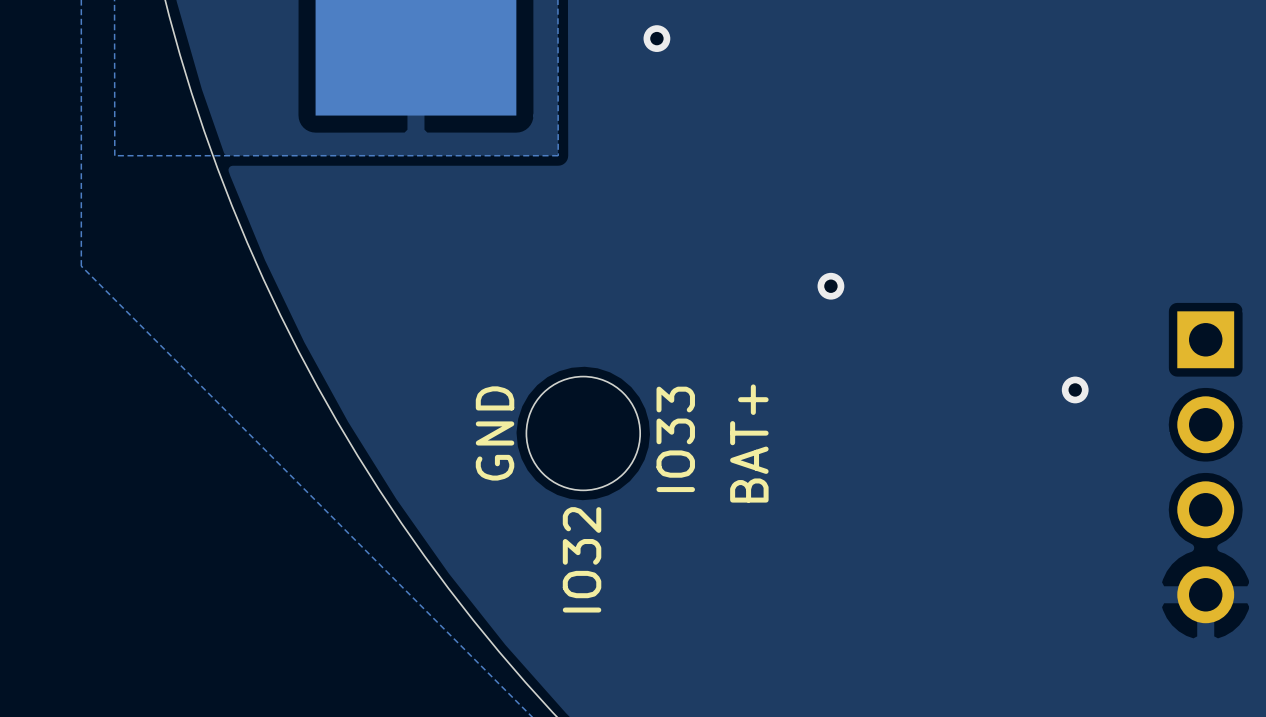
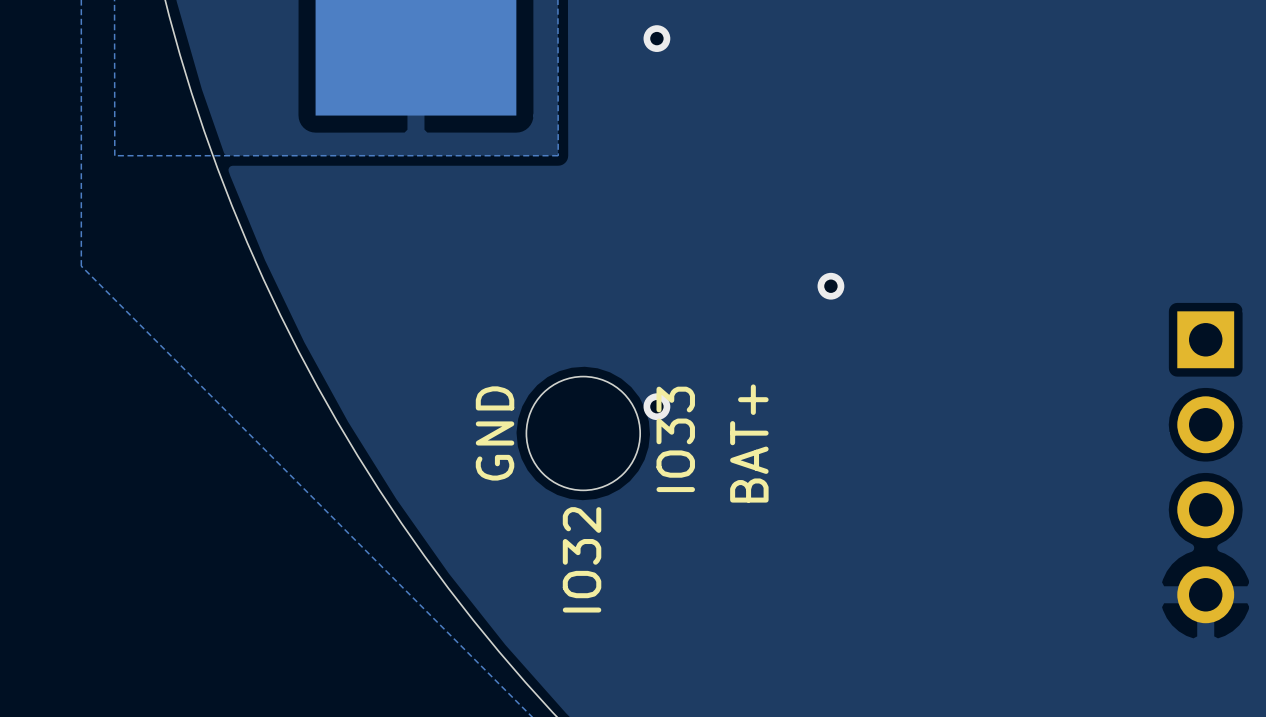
via: (1075, 389) -> none
via: none -> (656, 406)

